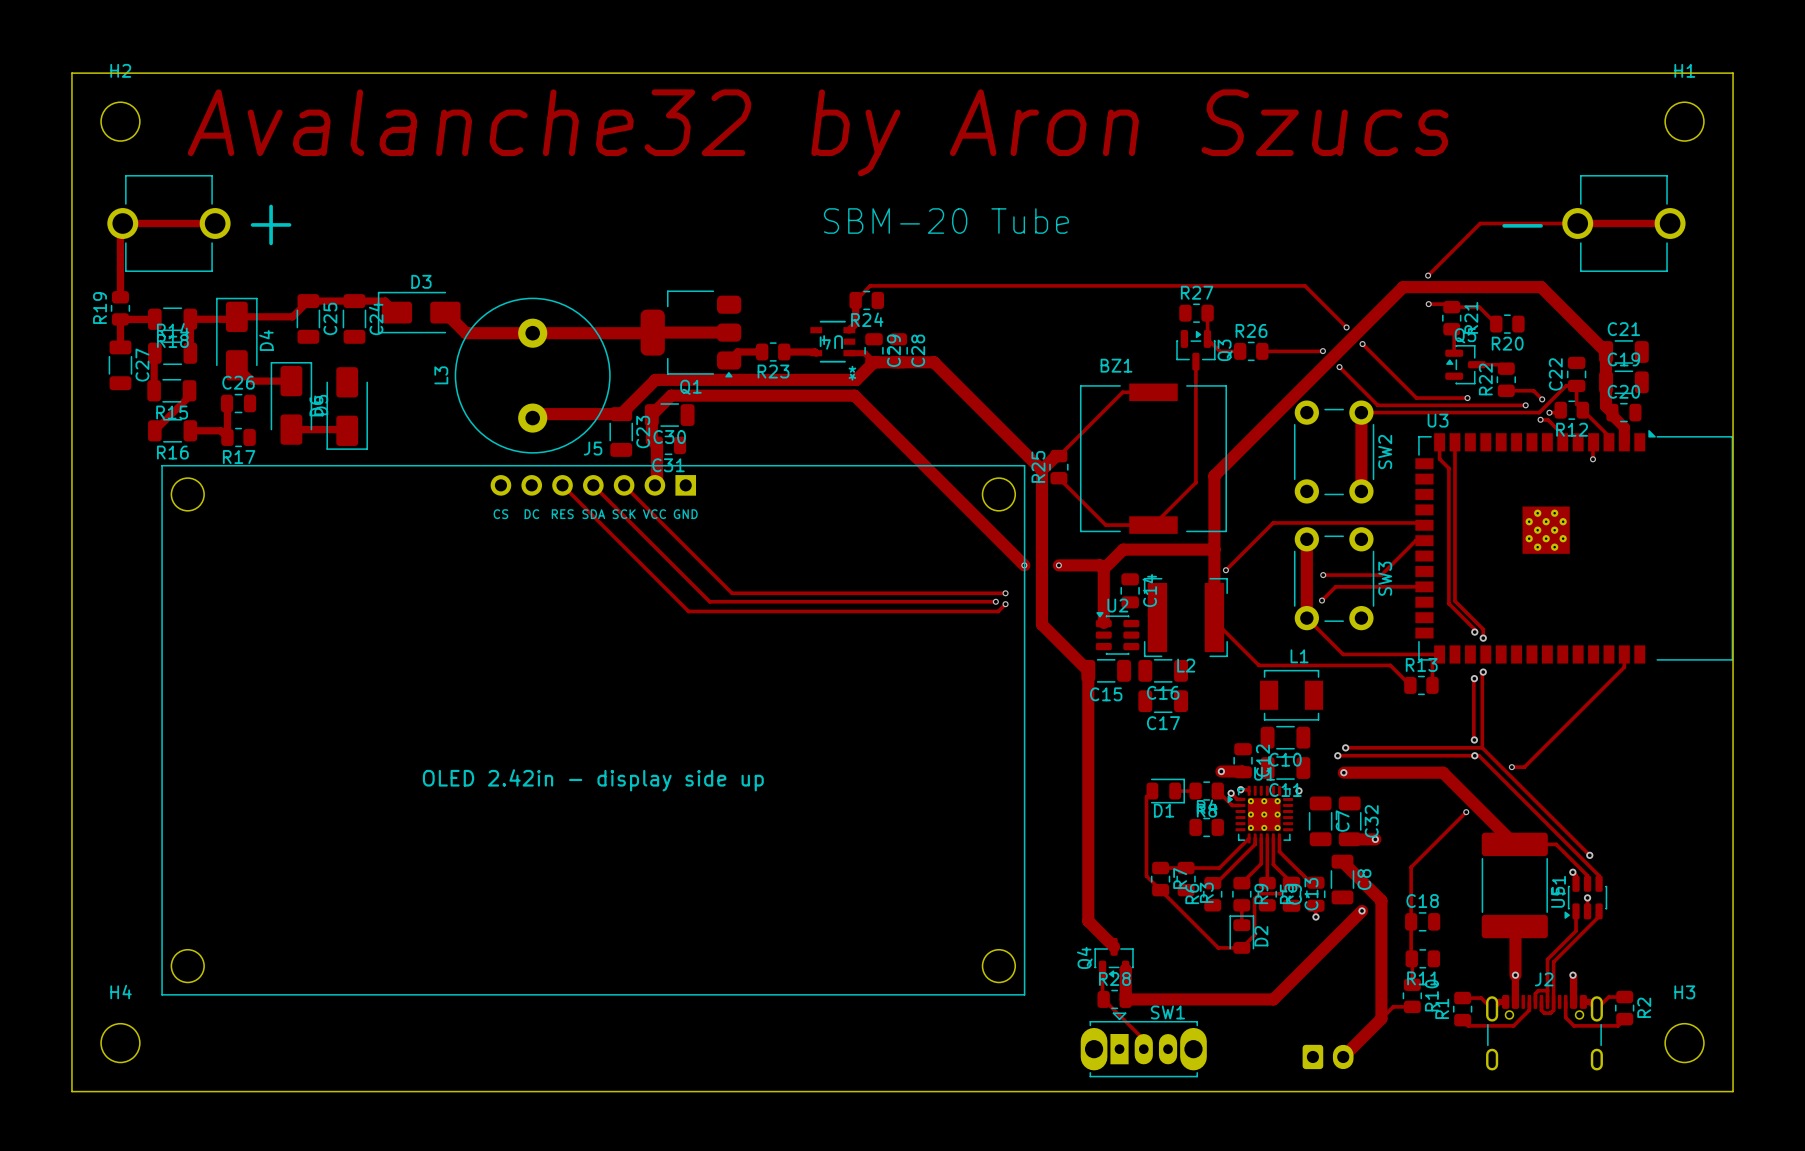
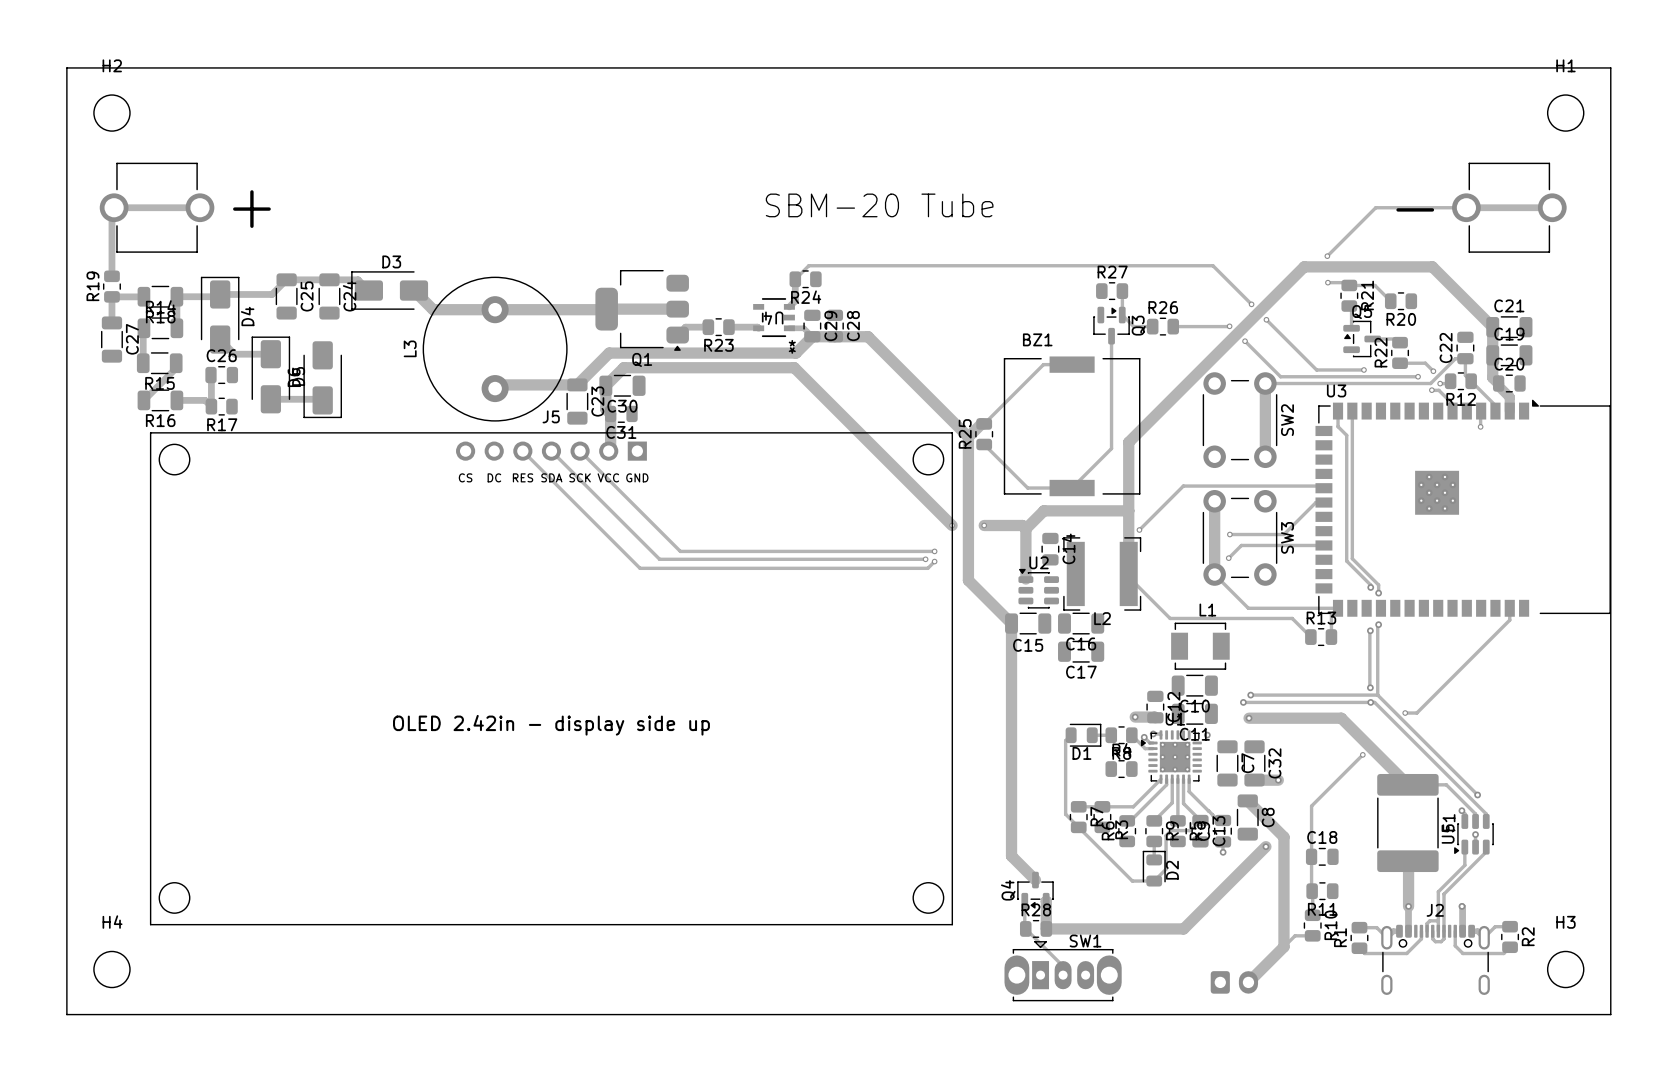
text: Avalanche32 by Aron Szucs (818, 132) -> none

